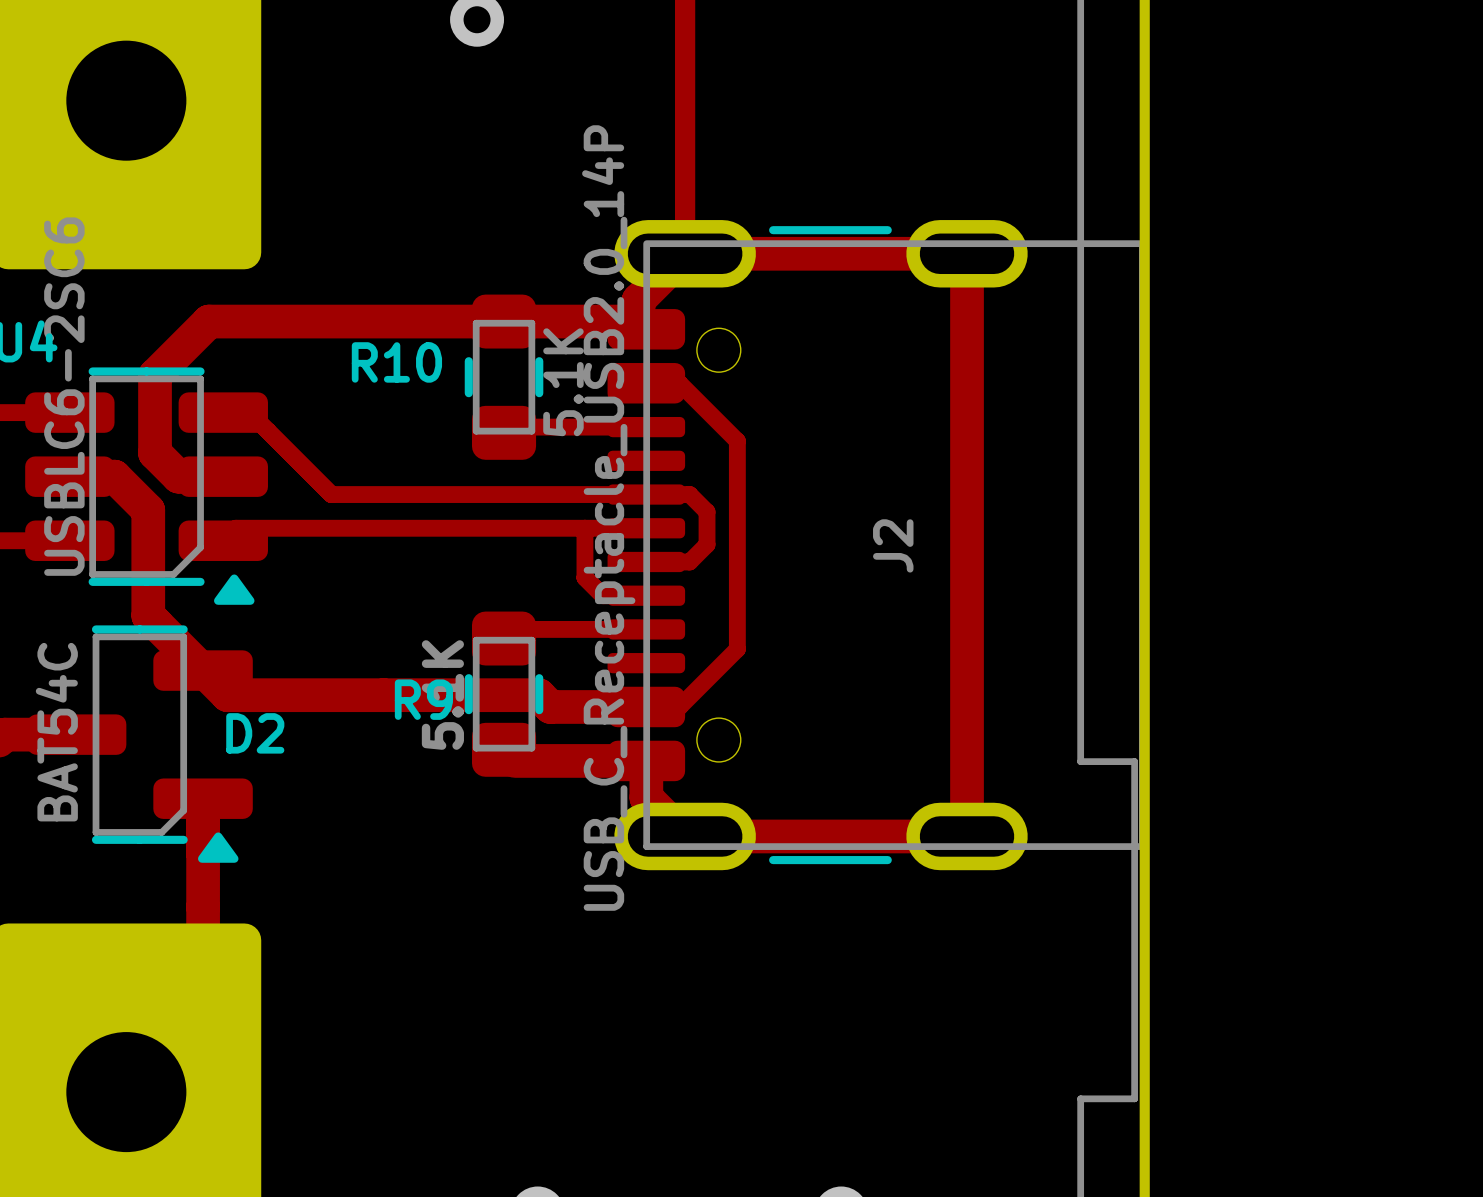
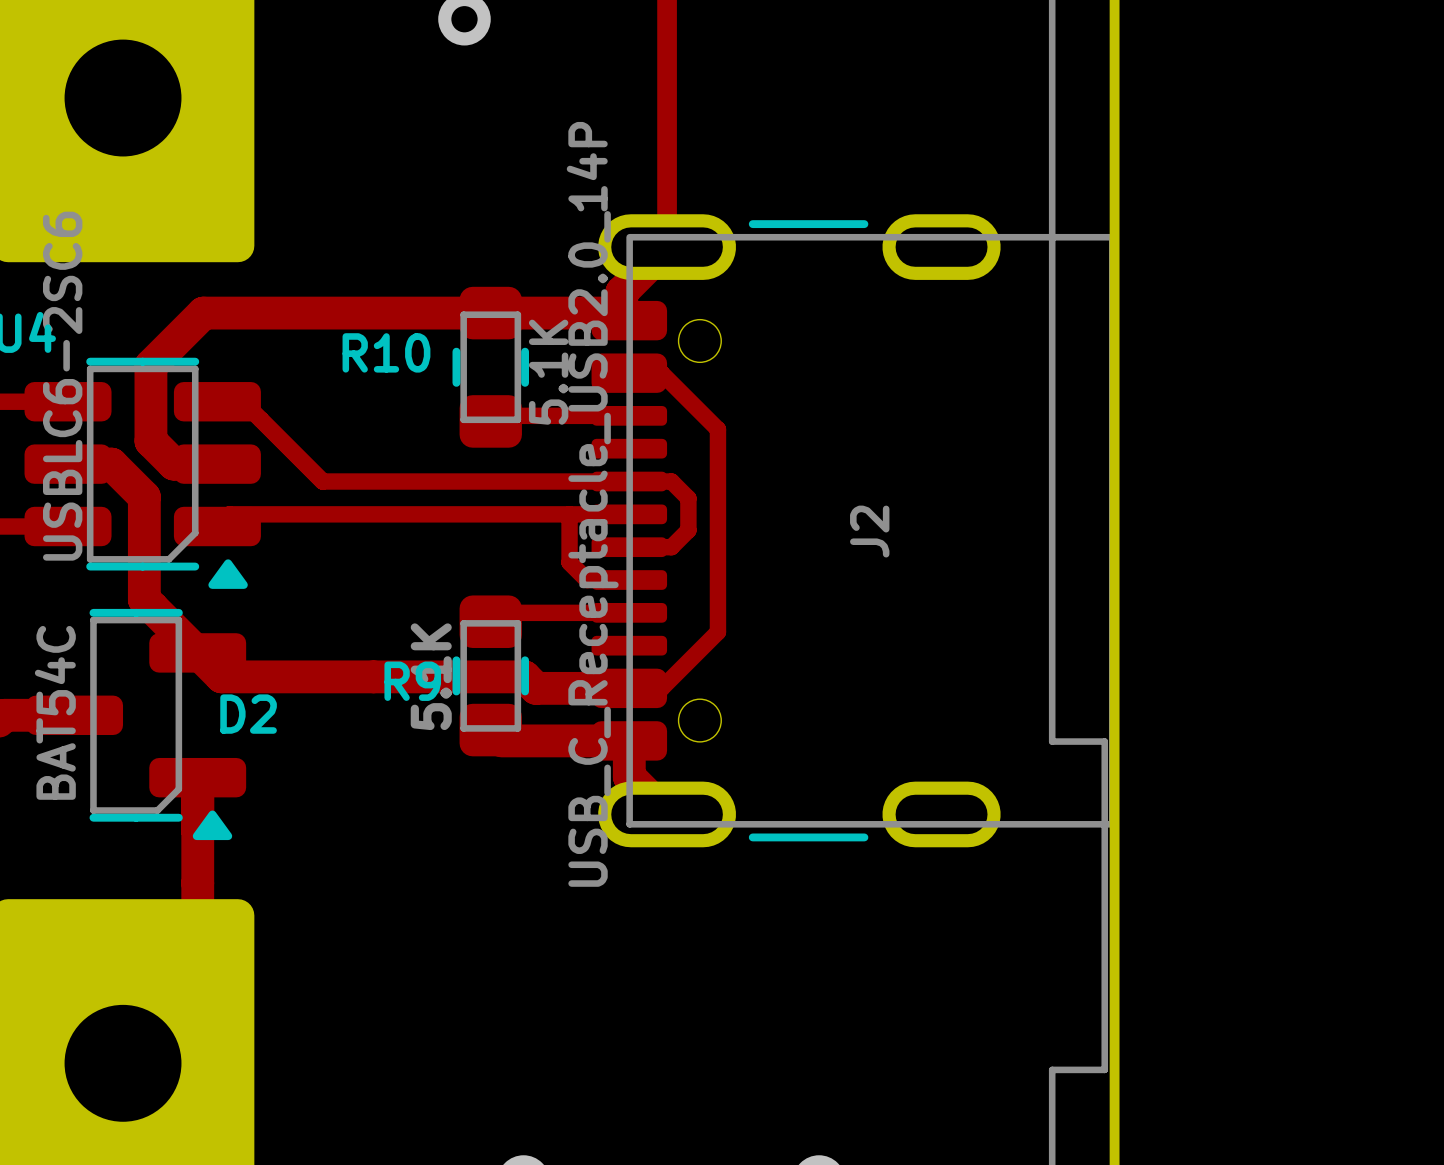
track: (685, 253) (967, 253) (967, 836) (685, 836) -> none

